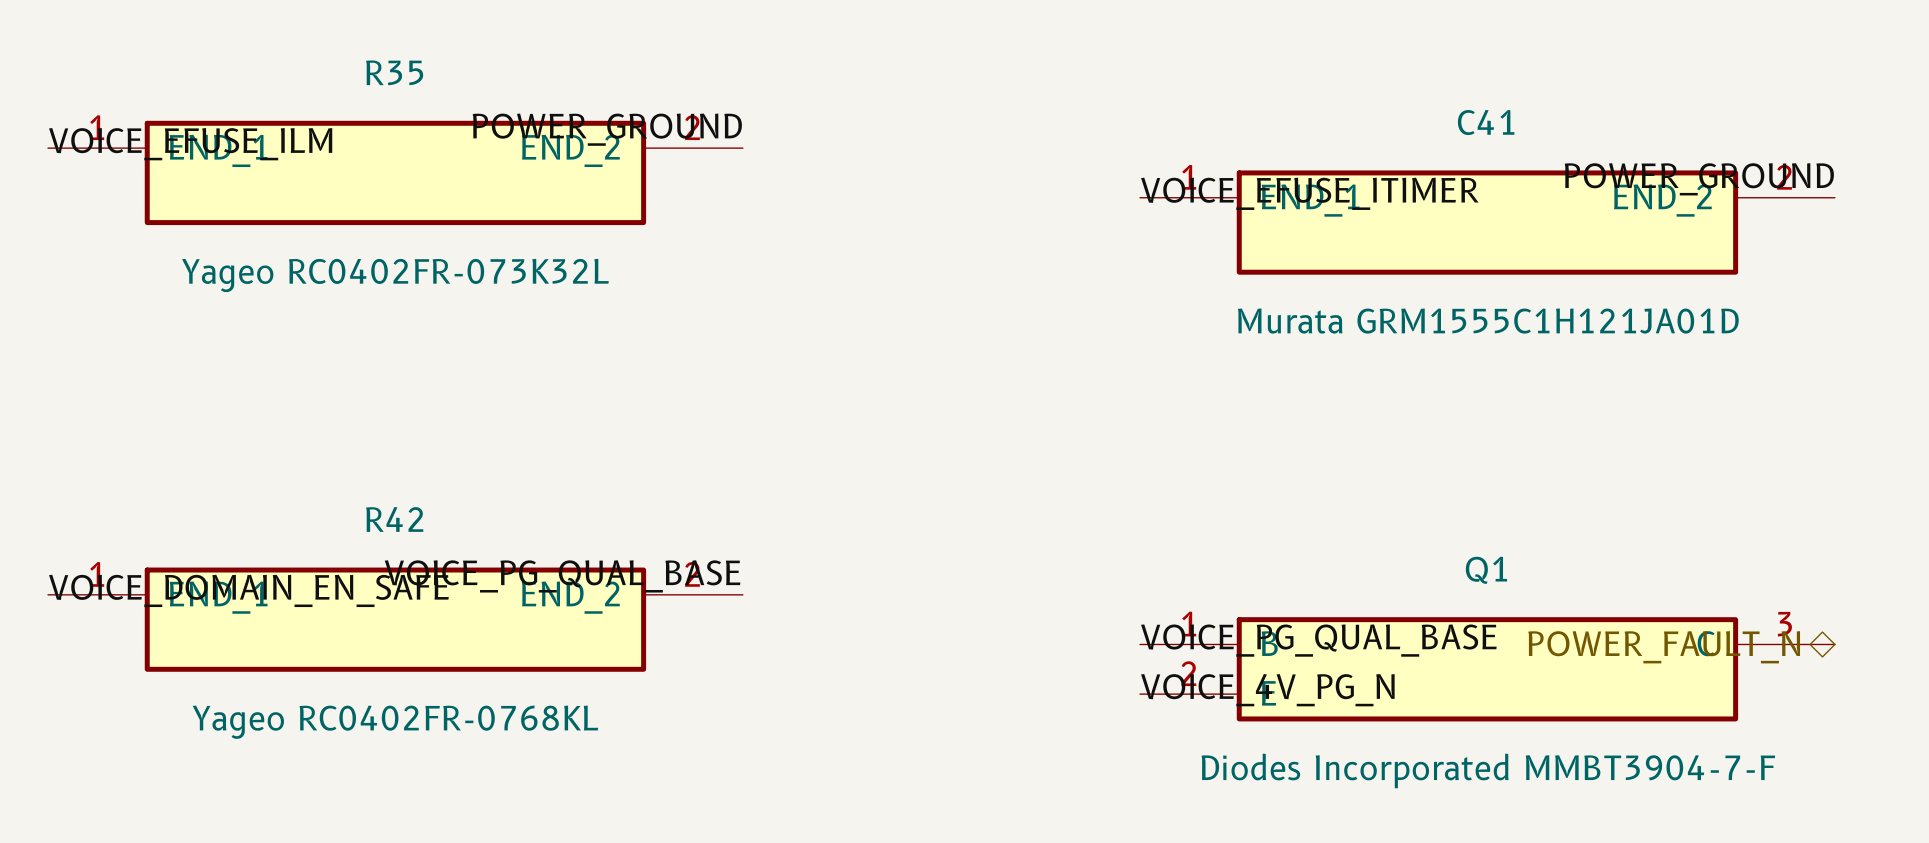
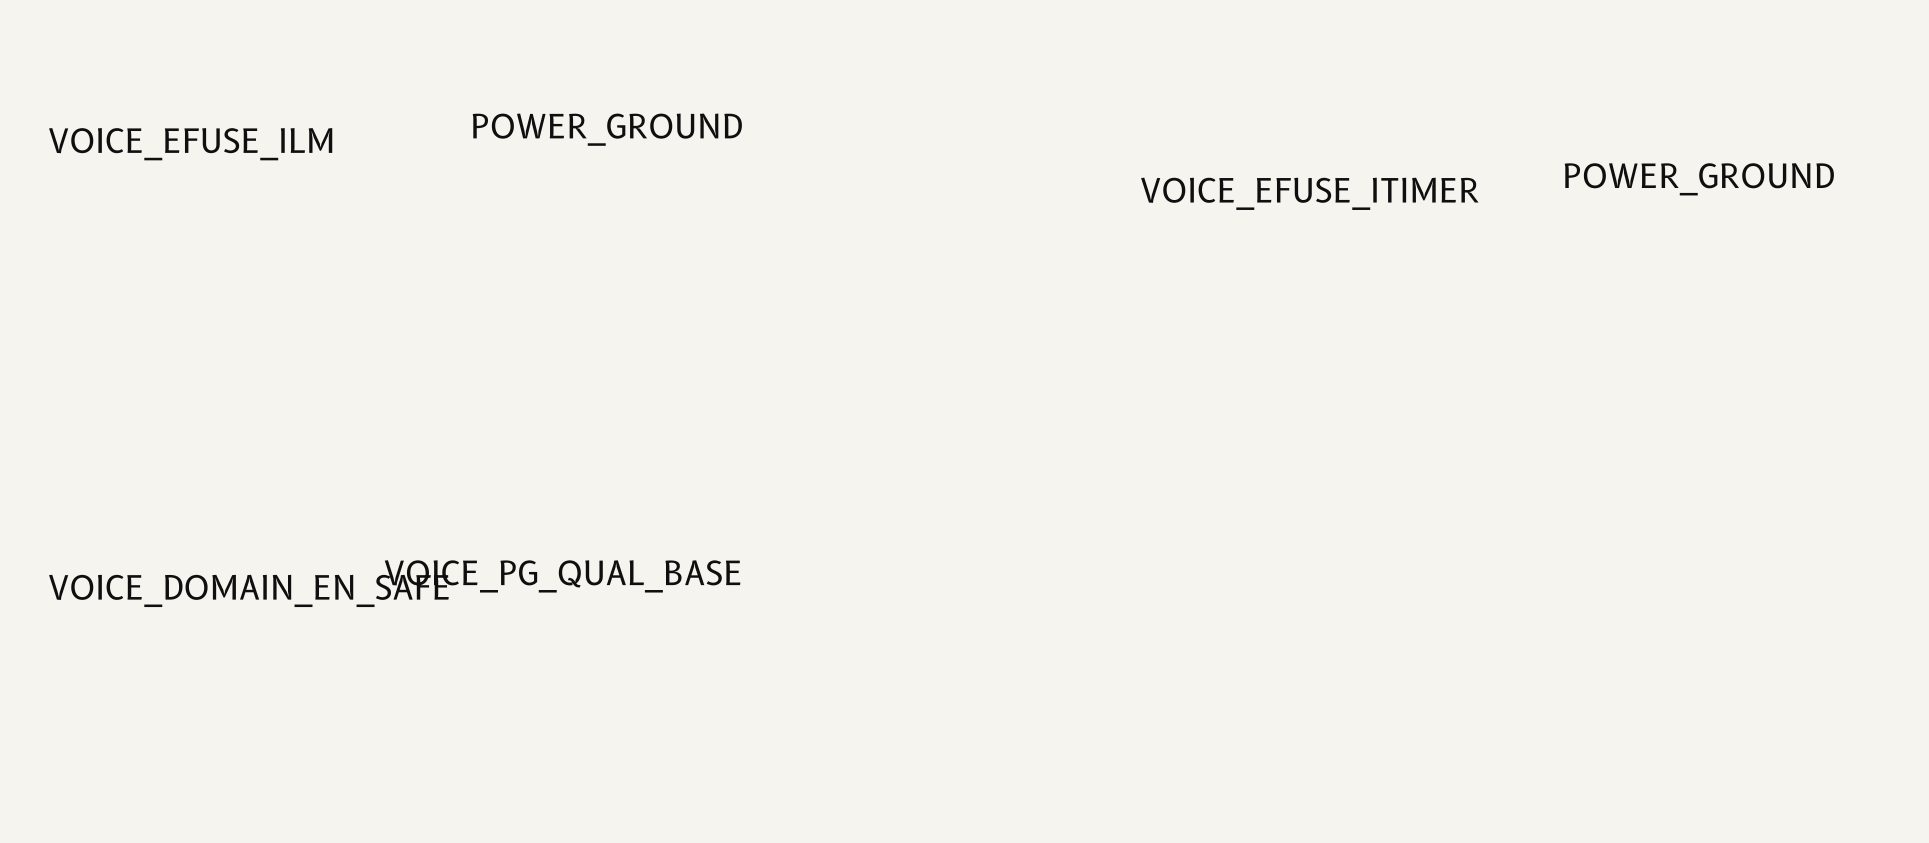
R35: Yageo RC0402FR-073K32L (395, 172) -> none
C41: Murata GRM1555C1H121JA01D (1487, 222) -> none
R42: Yageo RC0402FR-0768KL (395, 619) -> none
label: VOICE_PG_QUAL_BASE (1318, 640) -> none
hierarchical label: POWER_FAULT_N (1664, 647) -> none
Q1: Diodes Incorporated MMBT3904-7-F (1487, 669) -> none
label: VOICE_4V_PG_N (1267, 690) -> none

